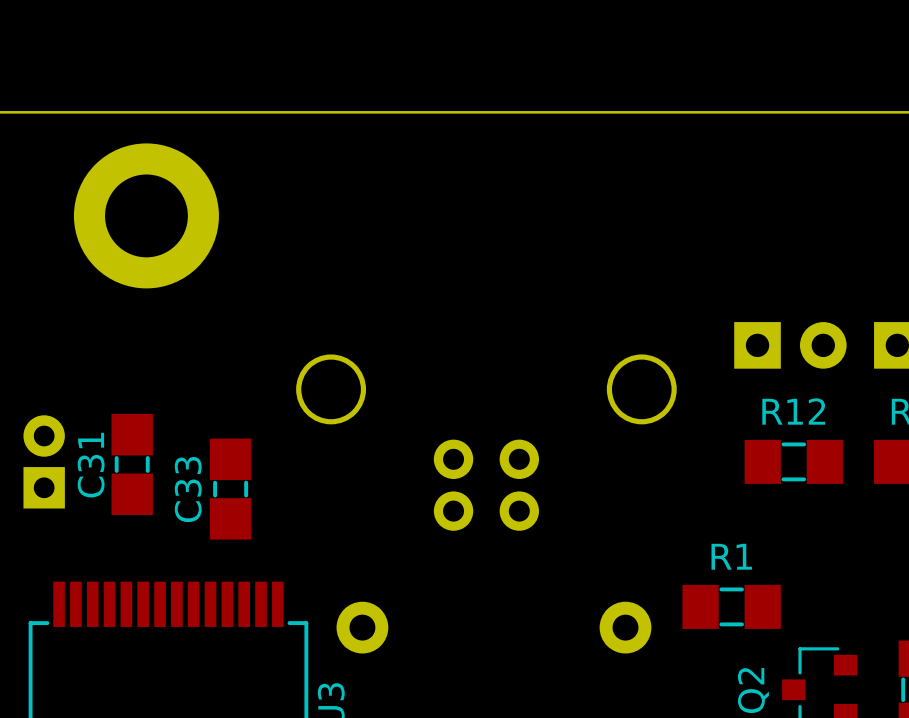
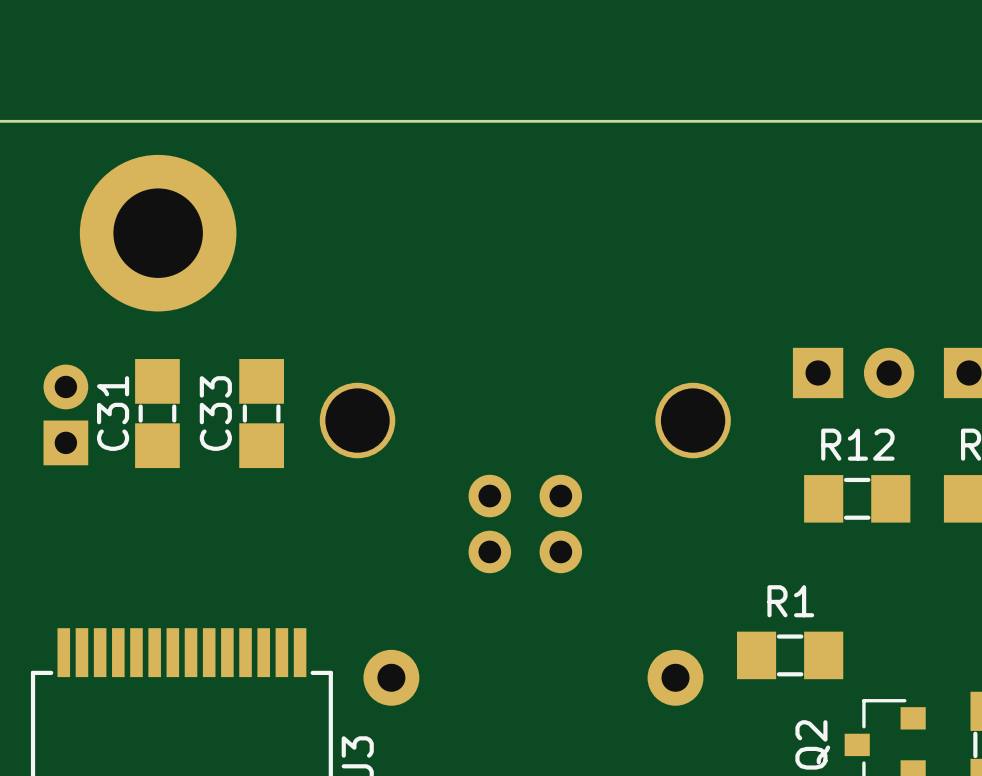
part position: (44, 461) -> (65, 414)
C31 position: (132, 464) -> (157, 413)
C33 position: (230, 489) -> (261, 413)

